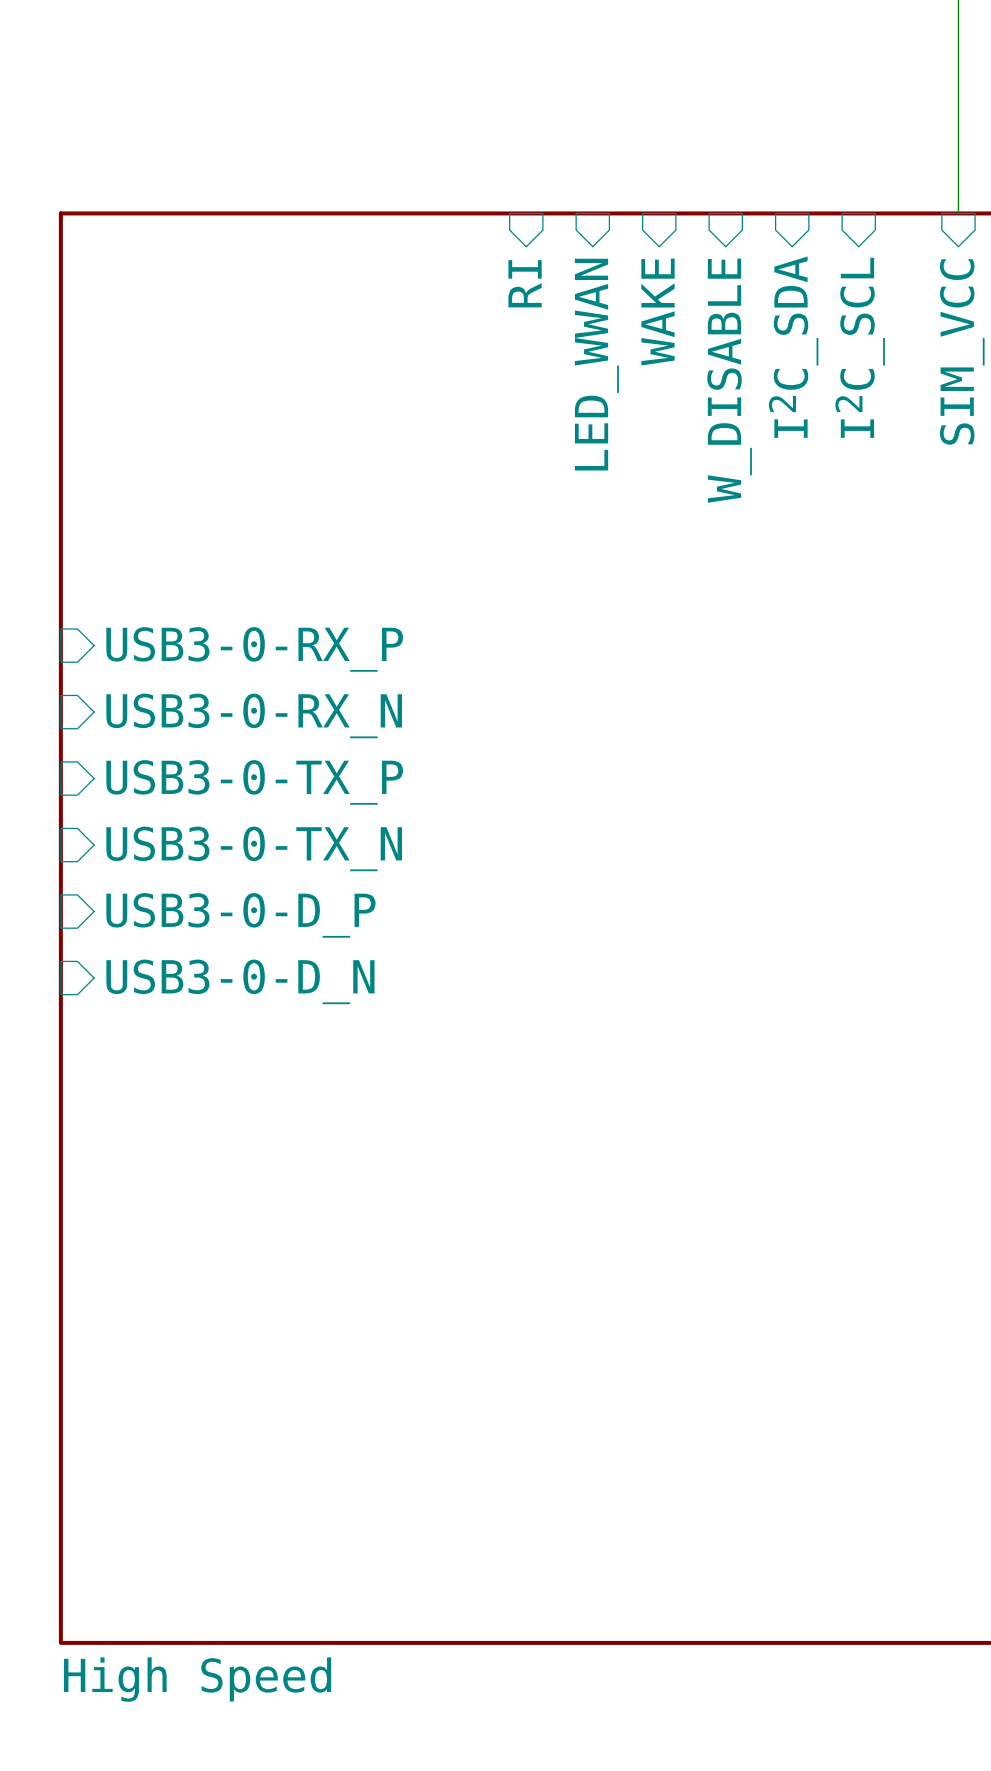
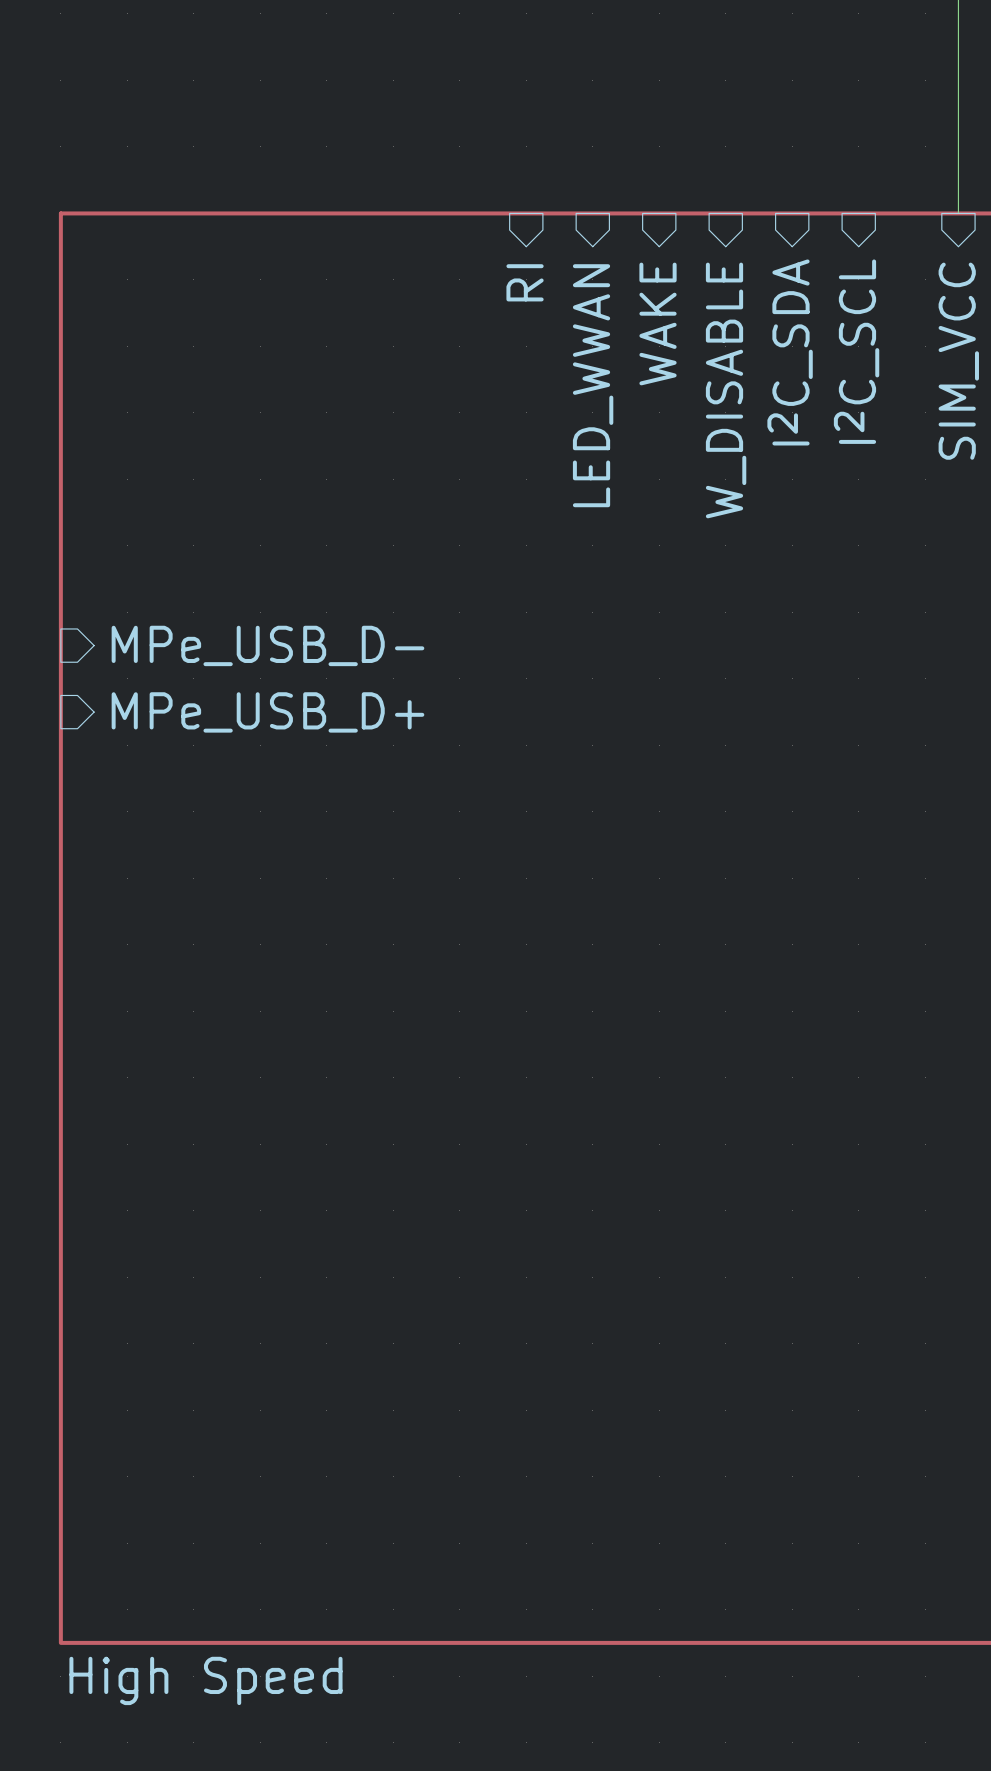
sheet pin: USB3-0-RX_P (254, 649) -> MPe_USB_D- (267, 645)
sheet pin: USB3-0-RX_N (254, 715) -> MPe_USB_D+ (267, 712)
sheet pin: USB3-0-TX_P (254, 782) -> none
sheet pin: USB3-0-TX_N (254, 848) -> none
sheet pin: USB3-0-D_P (240, 915) -> none
sheet pin: USB3-0-D_N (240, 981) -> none

